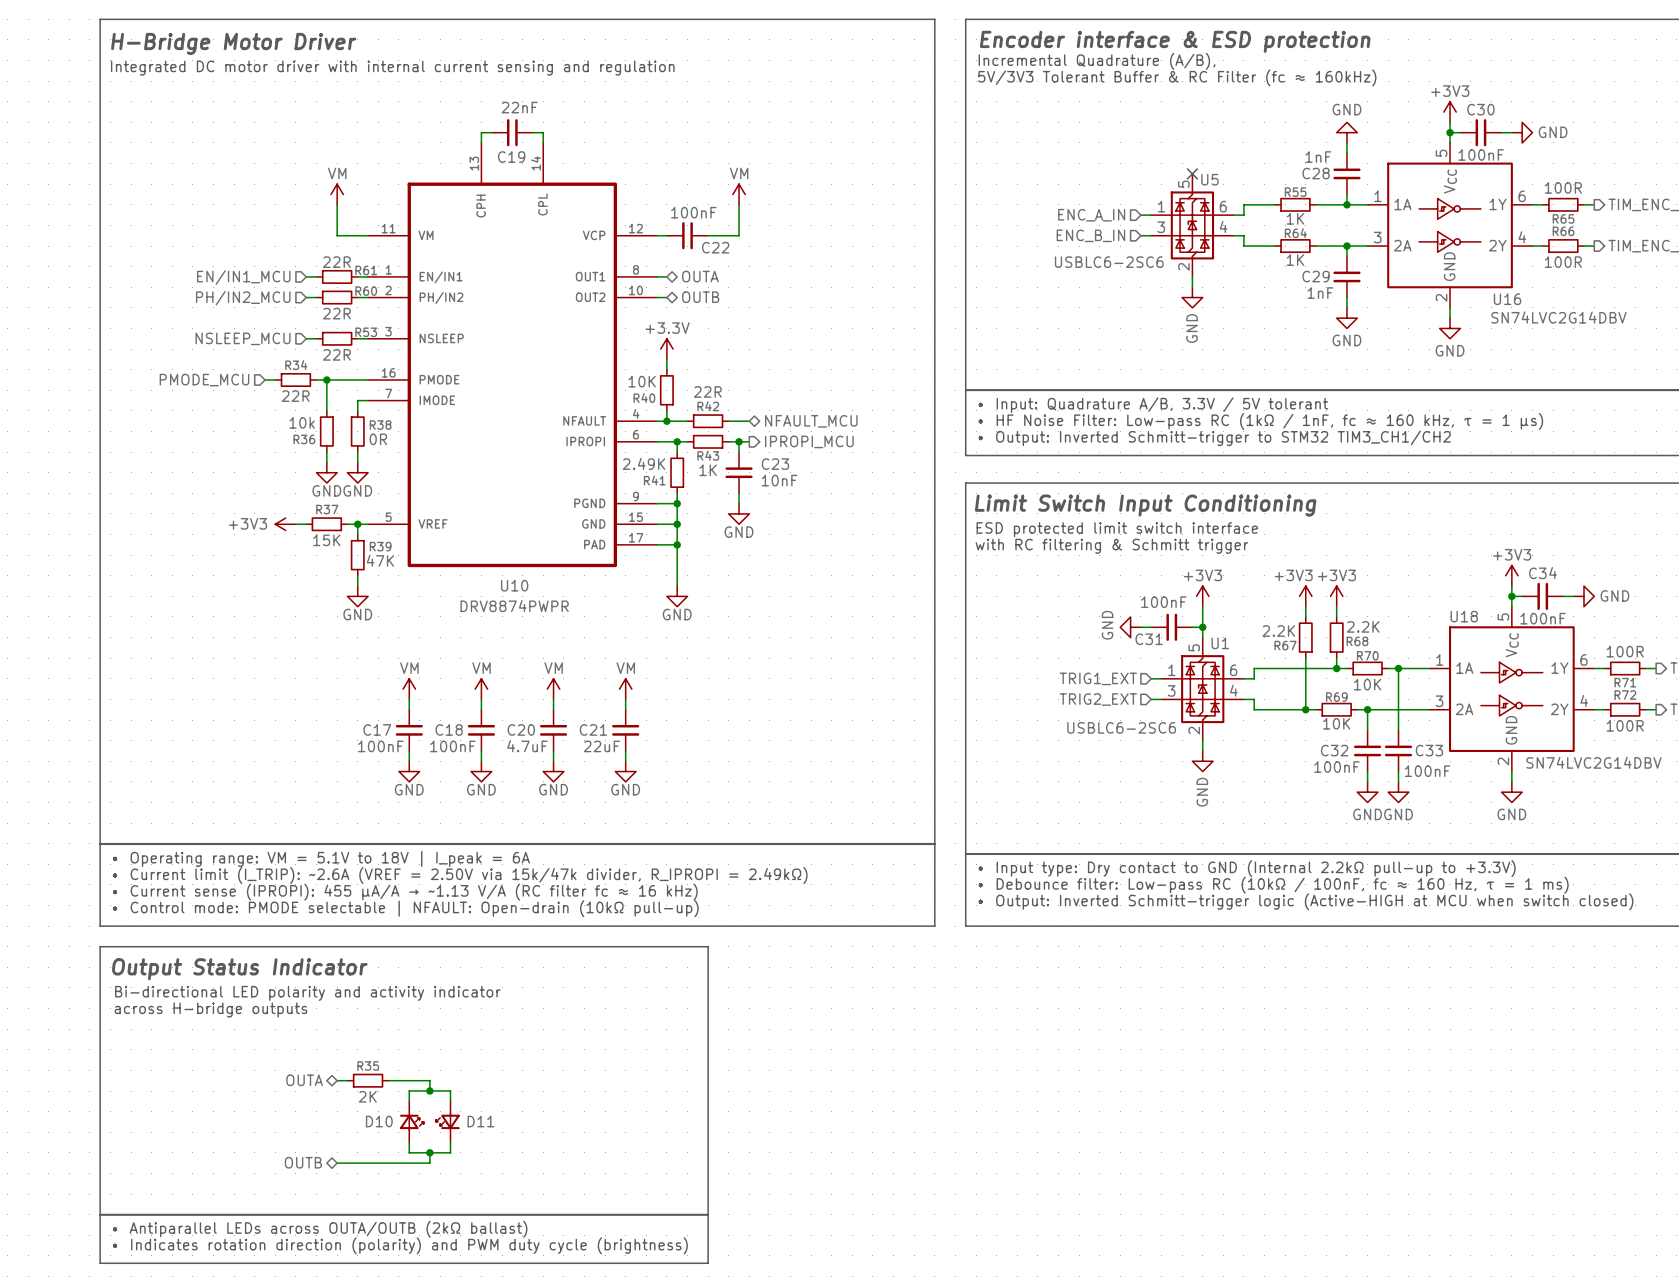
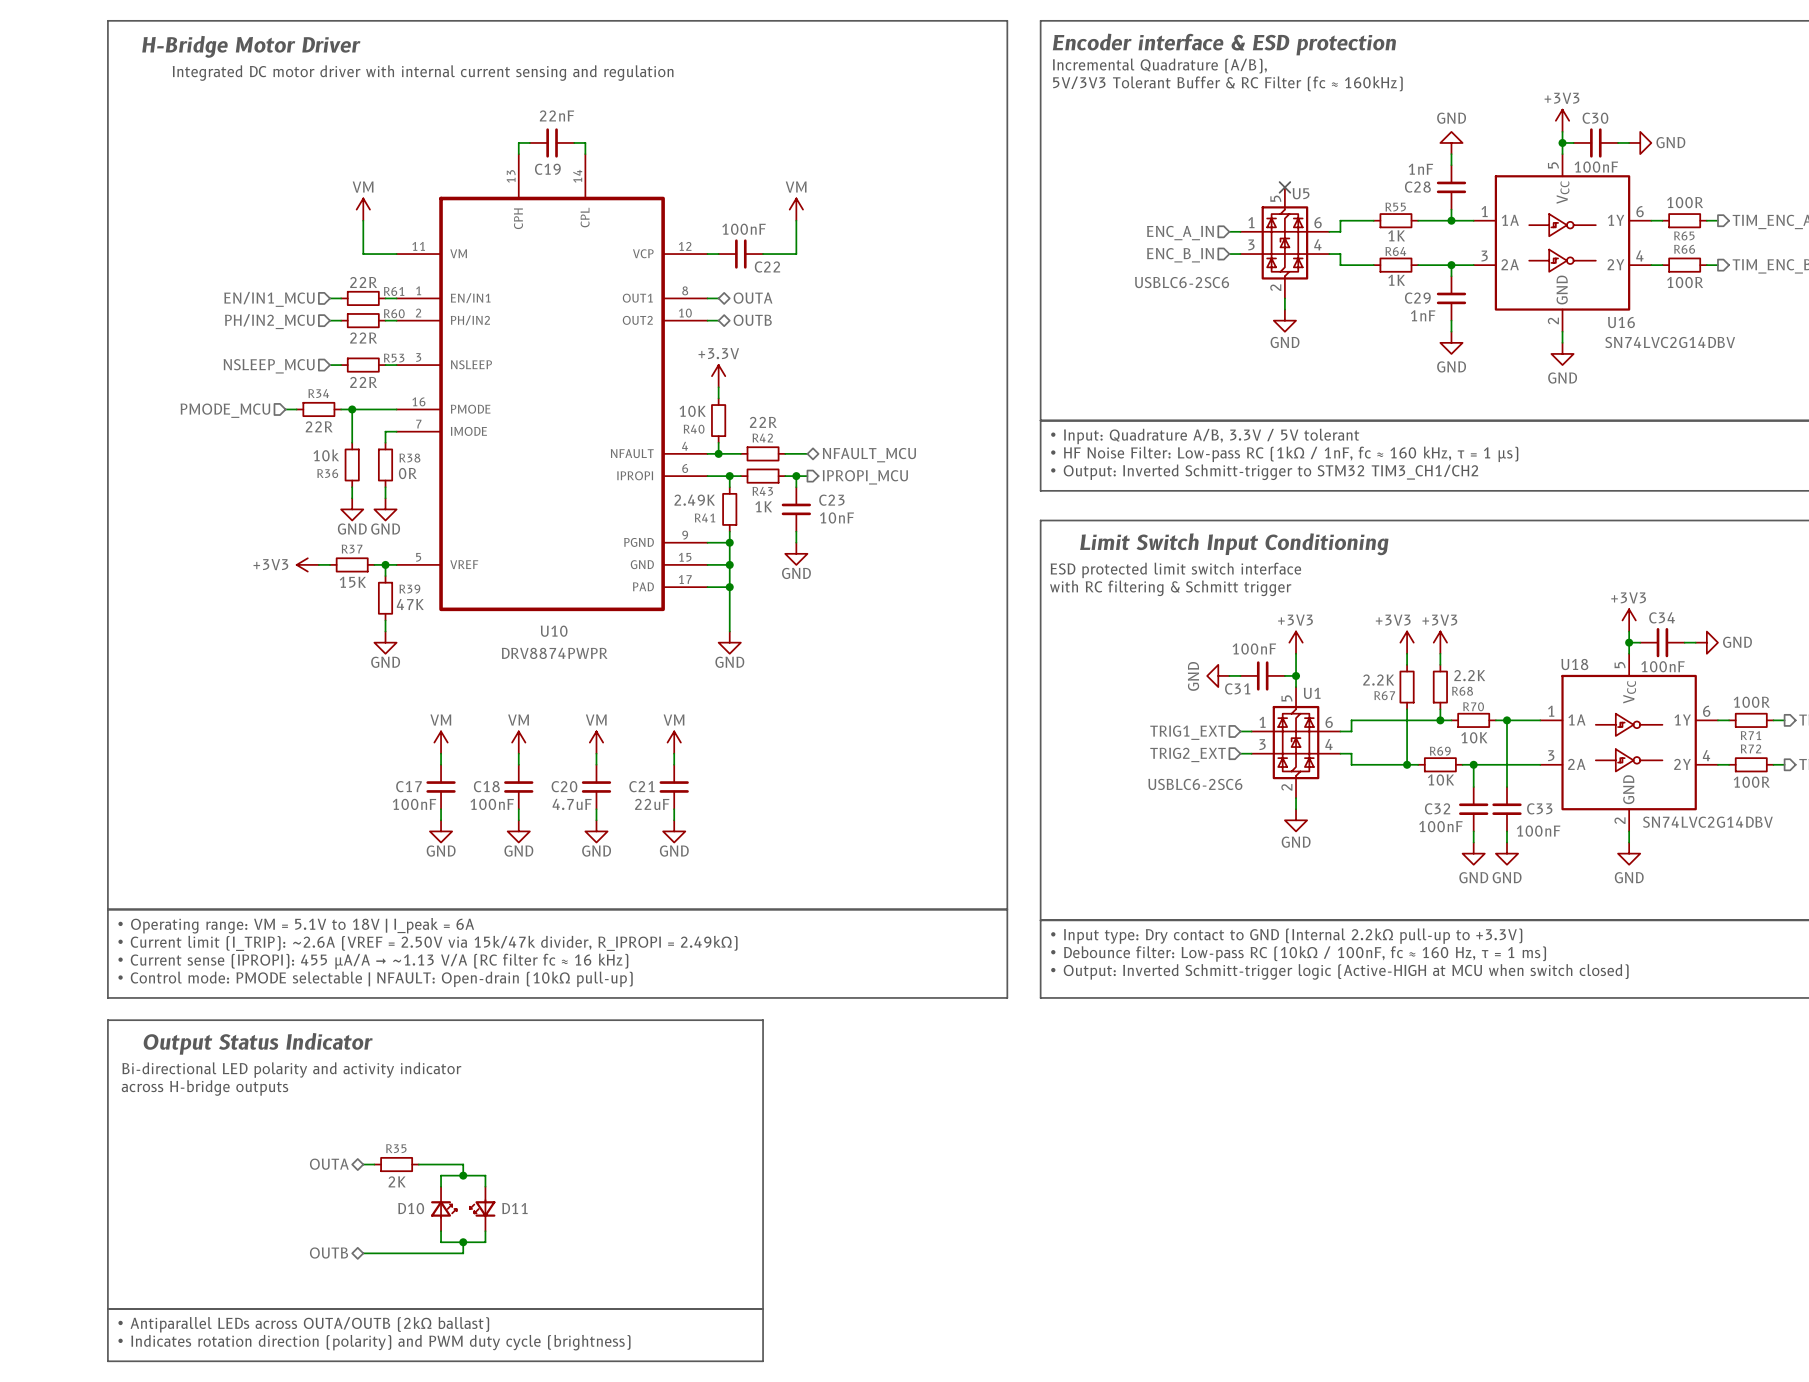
power symbol text rotation: 0° (1192, 328) -> 90° clockwise (1285, 342)
power symbol text rotation: 0° (1202, 792) -> 90° clockwise (1296, 842)

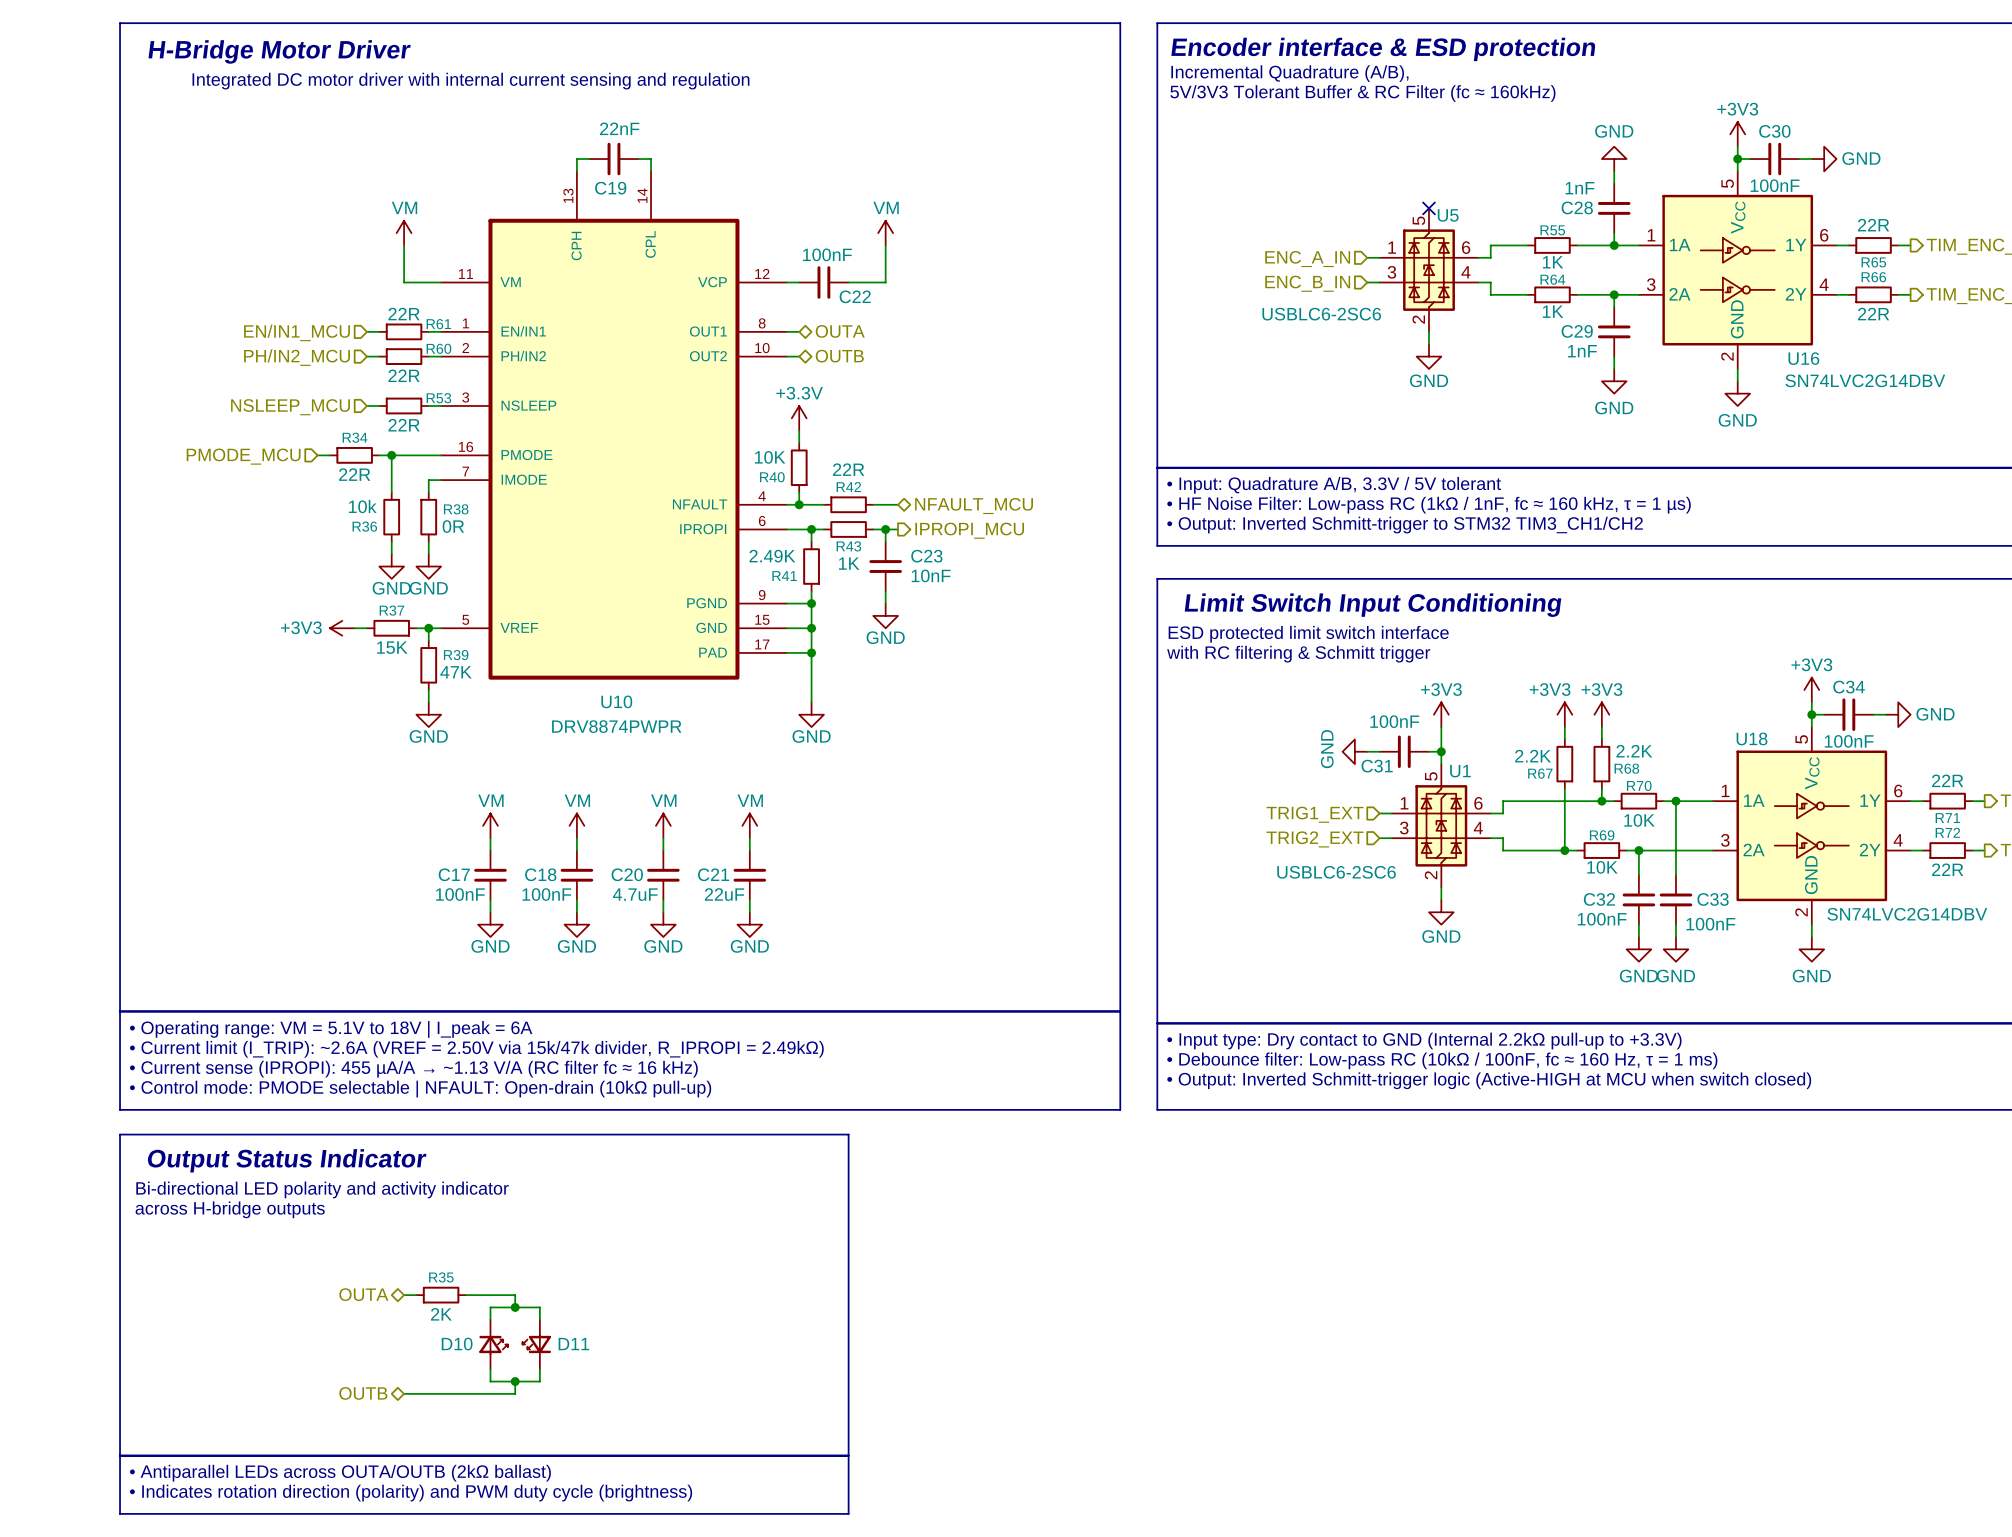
R65 value: 100R (1685, 202) -> 22R (1873, 225)
R66 value: 100R (1685, 282) -> 22R (1873, 314)
R71 value: 100R (1751, 702) -> 22R (1947, 780)
R72 value: 100R (1751, 782) -> 22R (1947, 869)

